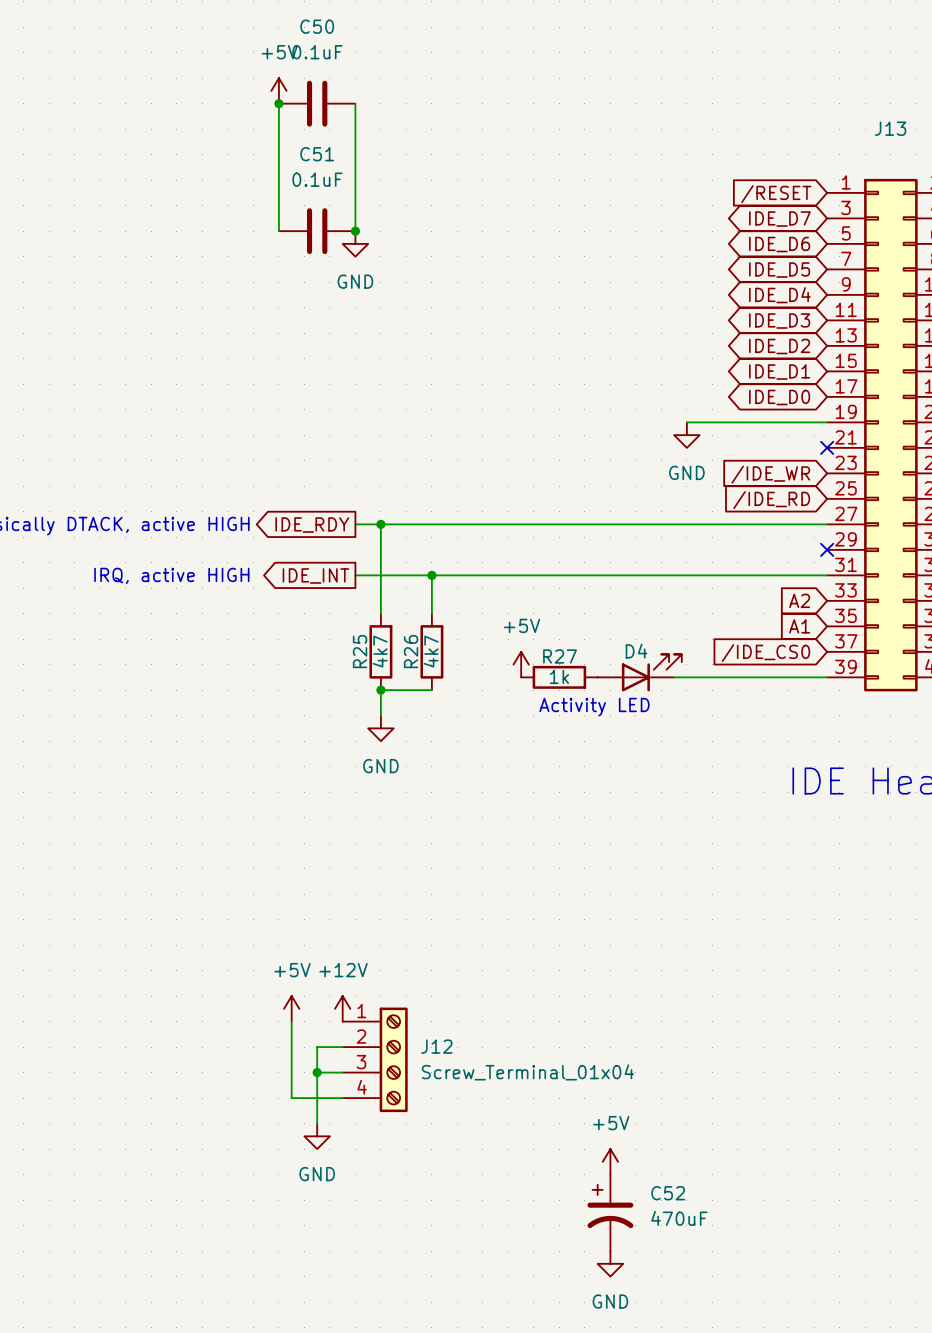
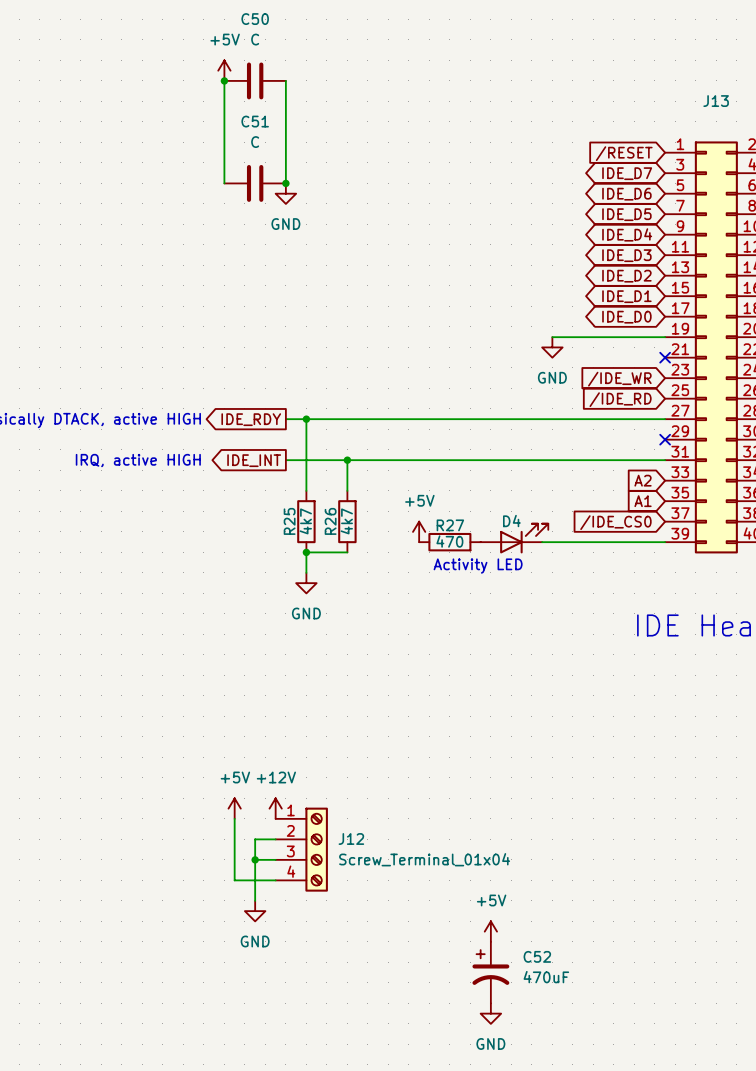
C50 value: 0.1uF (317, 52) -> C (255, 39)
C51 value: 0.1uF (317, 179) -> C (255, 142)
R27 value: 1k (559, 676) -> 470 (449, 541)

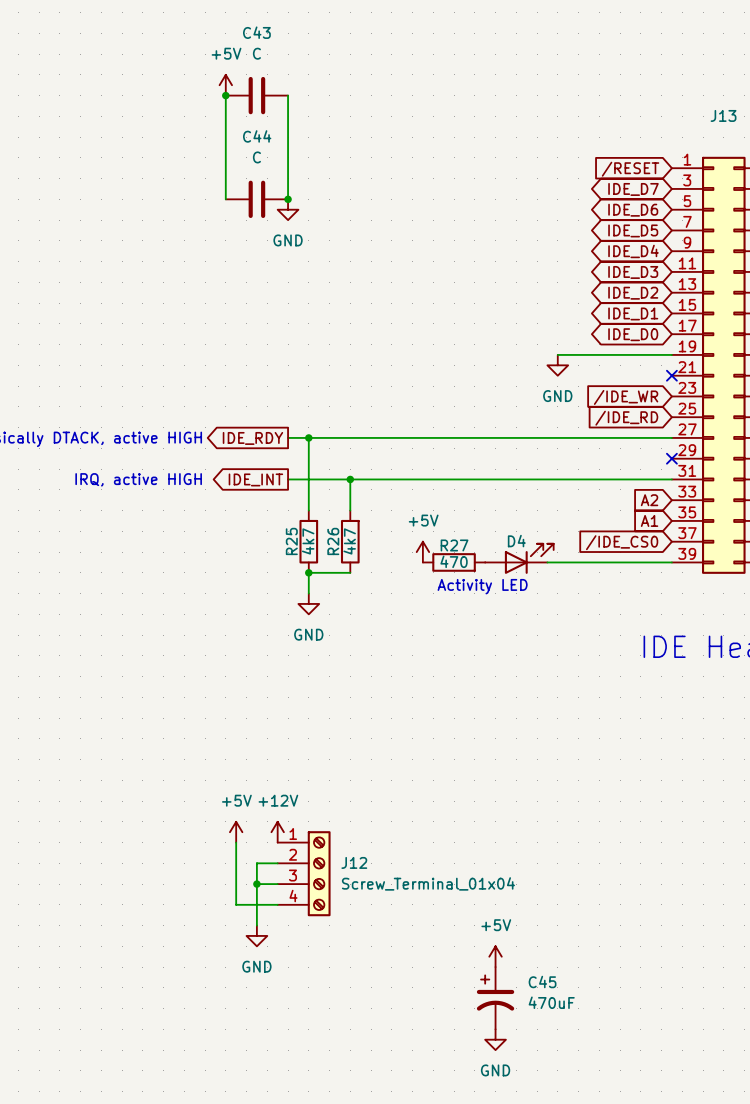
C50 name: C50 (255, 19) -> C43 (256, 32)
C51 name: C51 (255, 121) -> C44 (257, 136)
C52 name: C52 (537, 956) -> C45 (542, 982)

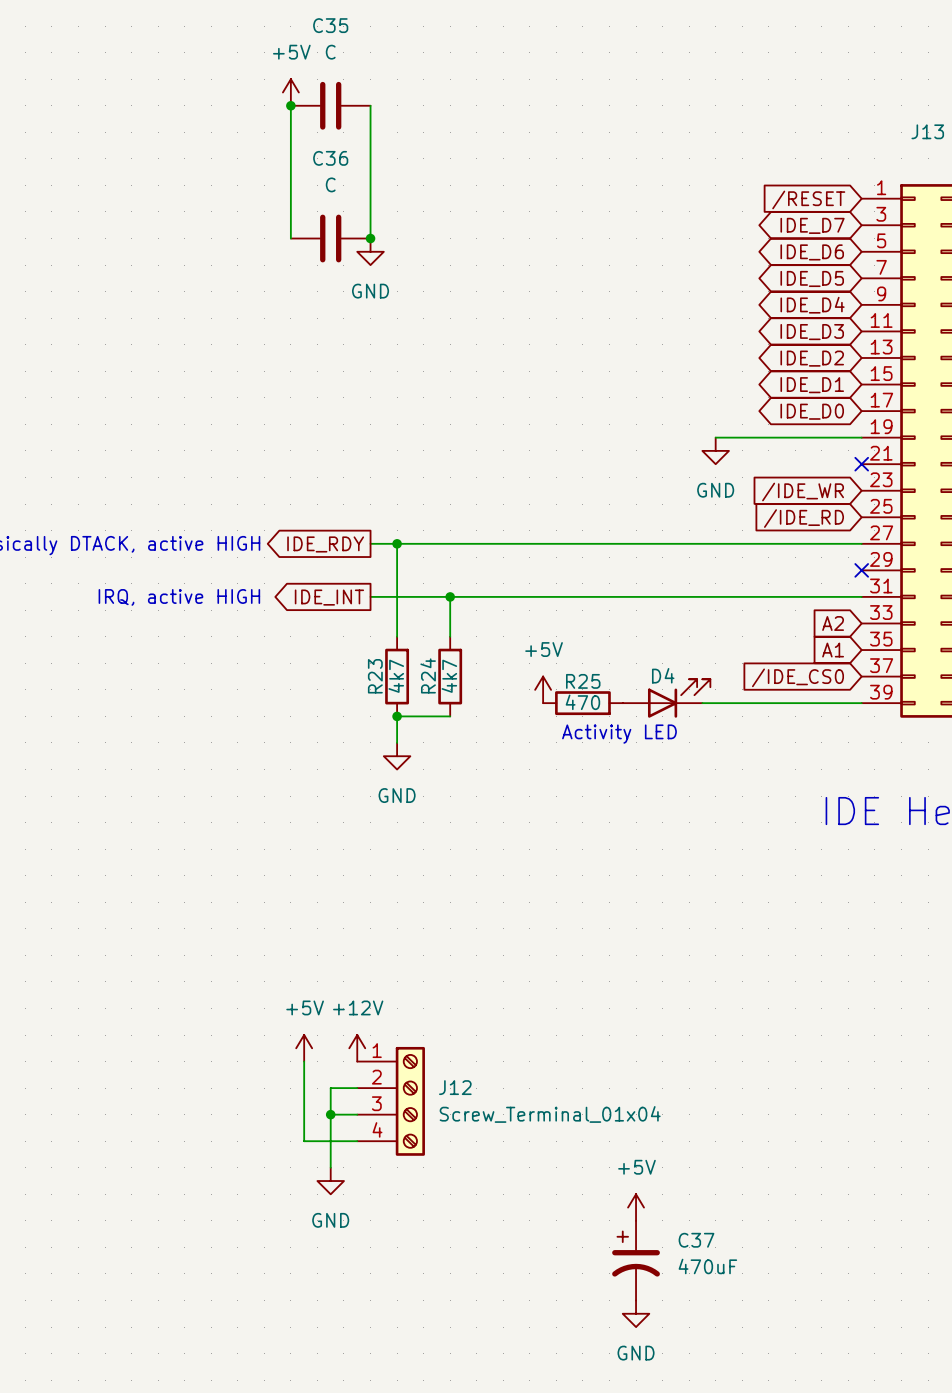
C43 name: C43 (256, 32) -> C35 (330, 25)
C44 name: C44 (257, 136) -> C36 (330, 158)
R25 name: R25 (291, 541) -> R23 (375, 676)
R26 name: R26 (333, 541) -> R24 (428, 675)
R27 name: R27 (454, 545) -> R25 (583, 681)
C45 name: C45 (542, 982) -> C37 (696, 1240)

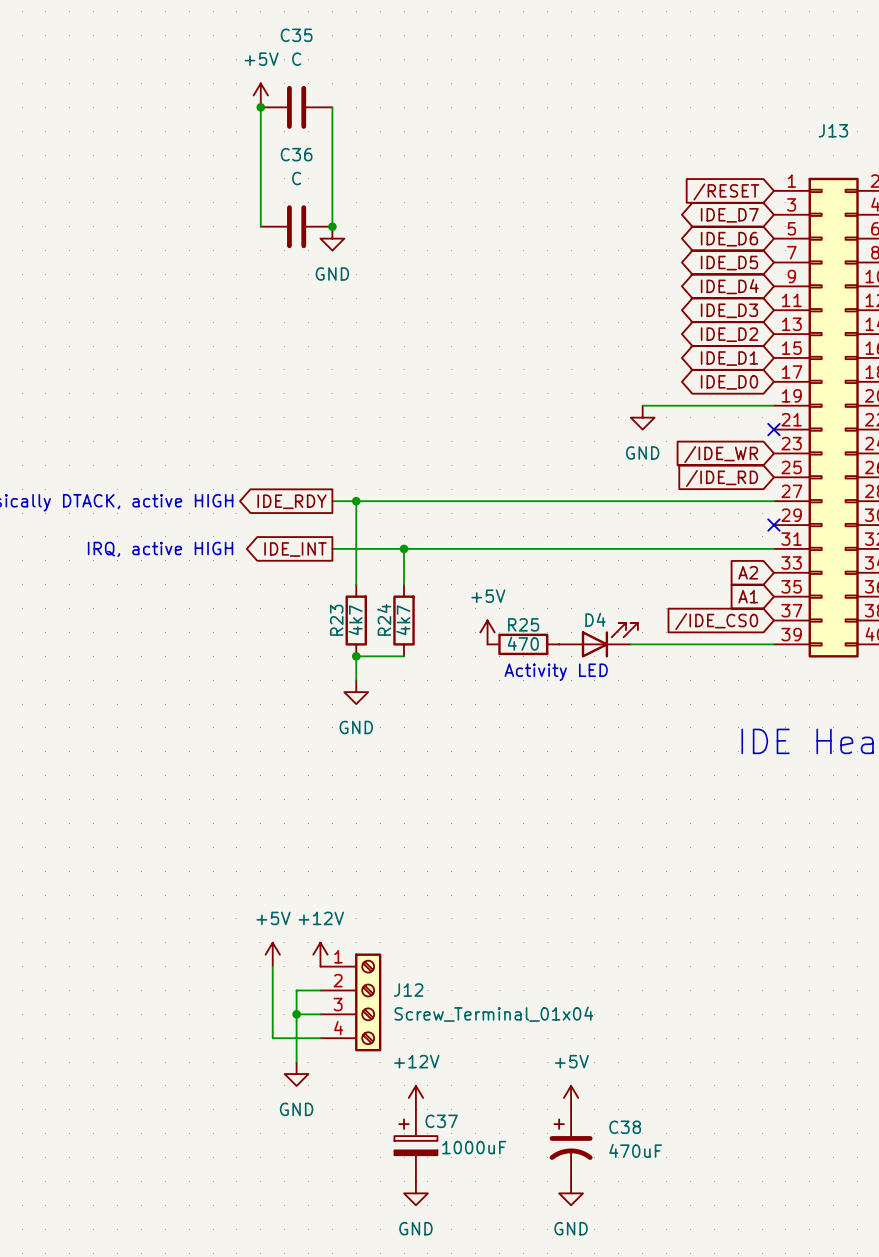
power symbol: none -> +12V (415, 1097)
C37 name: C37 (696, 1240) -> C38 (625, 1127)
C37: none -> 1000uF (415, 1145)
power symbol: none -> GND (415, 1193)

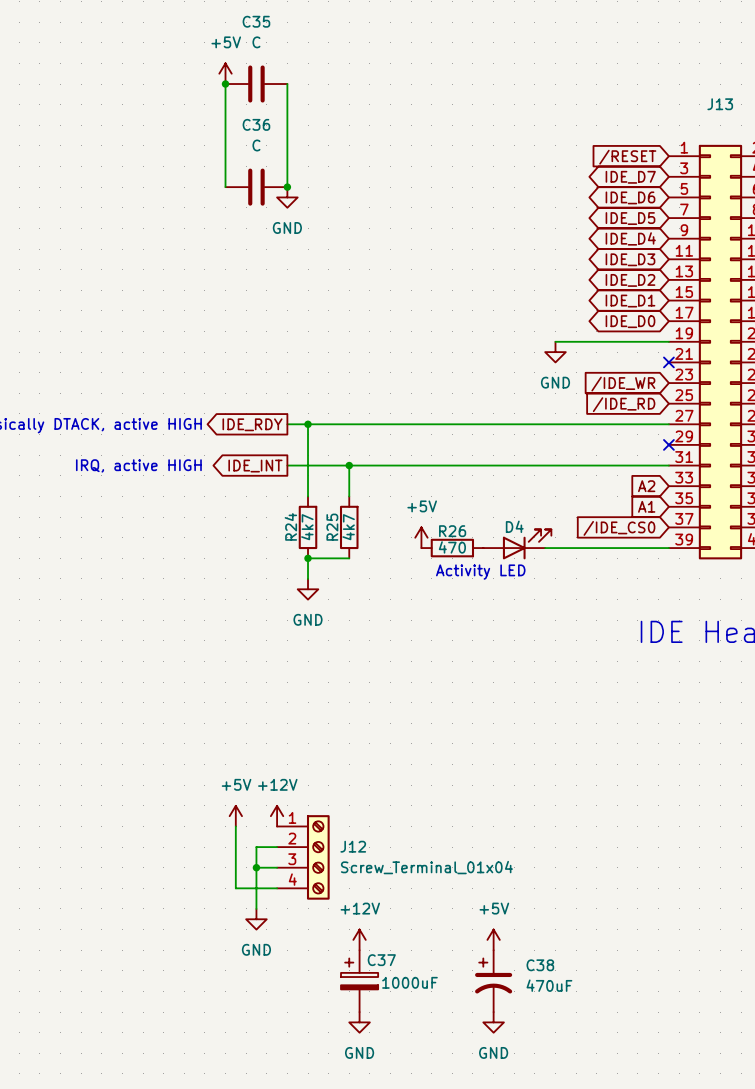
R24 name: R24 (384, 619) -> R25 (332, 527)
R23 name: R23 (336, 620) -> R24 (290, 526)
R25 name: R25 (523, 624) -> R26 (452, 531)

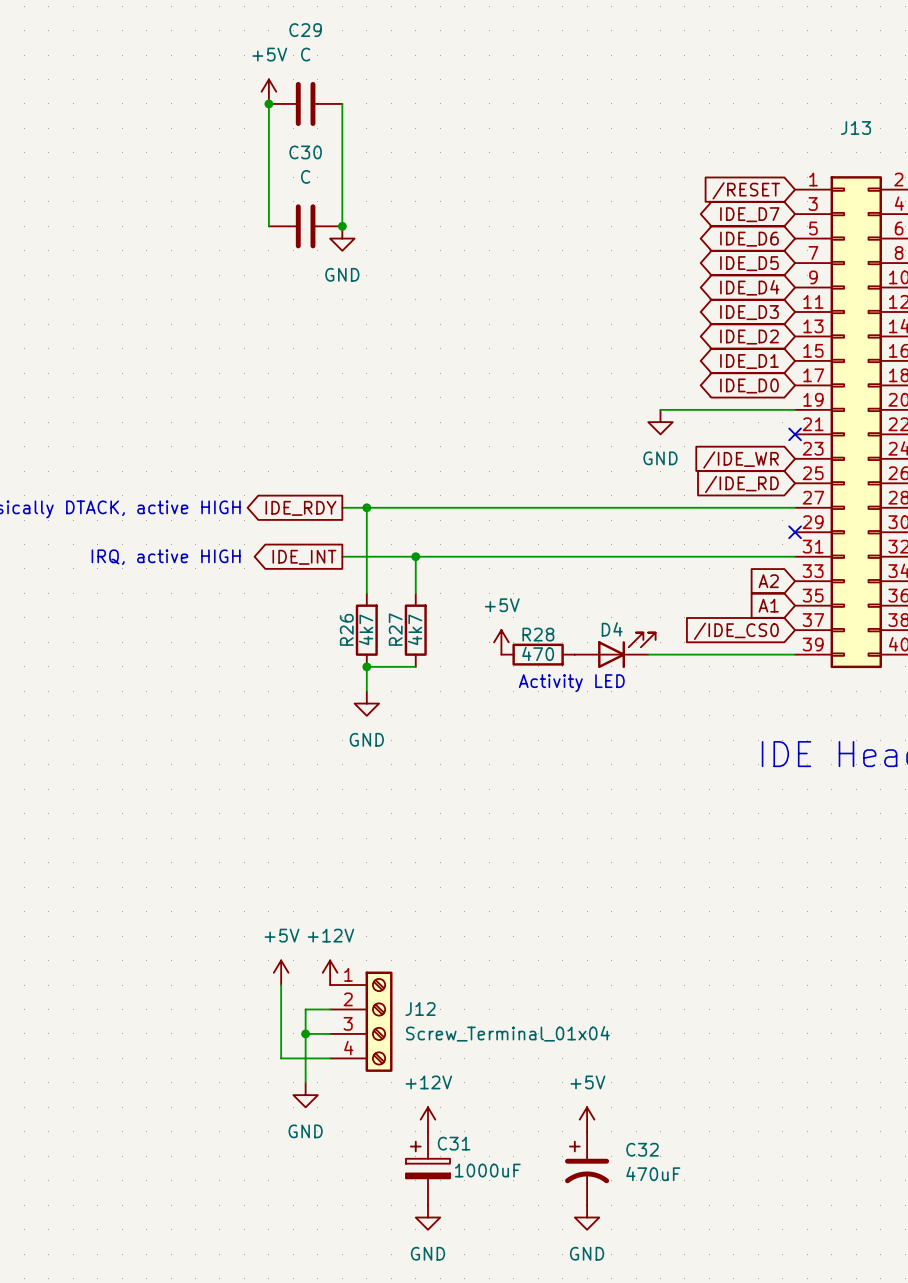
C35 name: C35 (256, 21) -> C29 (305, 30)
C36 name: C36 (256, 124) -> C30 (305, 152)
R24 name: R24 (290, 526) -> R26 (346, 629)
R25 name: R25 (332, 527) -> R27 (395, 629)
R26 name: R26 (452, 531) -> R28 (538, 634)
C37 name: C37 (381, 960) -> C31 (454, 1143)
C38 name: C38 (540, 965) -> C32 (642, 1149)

